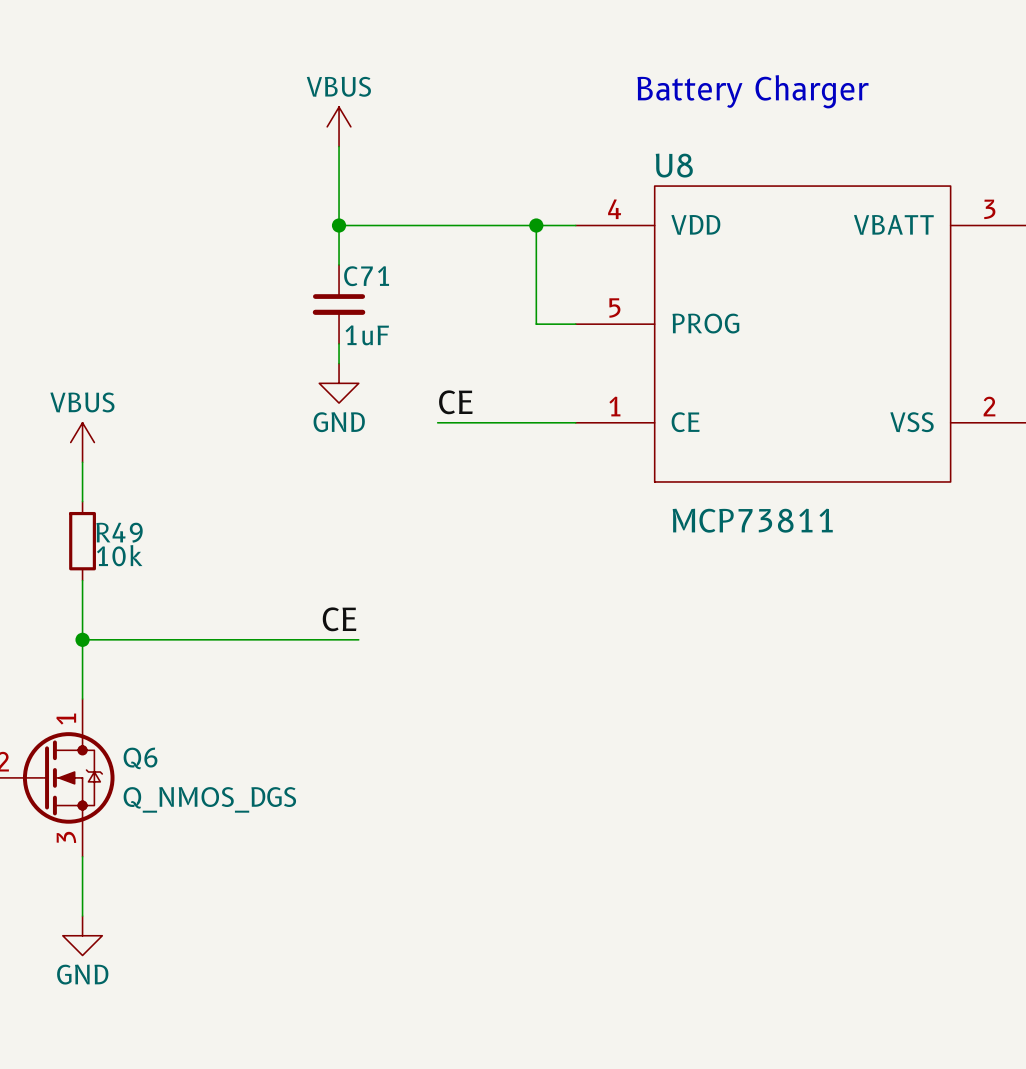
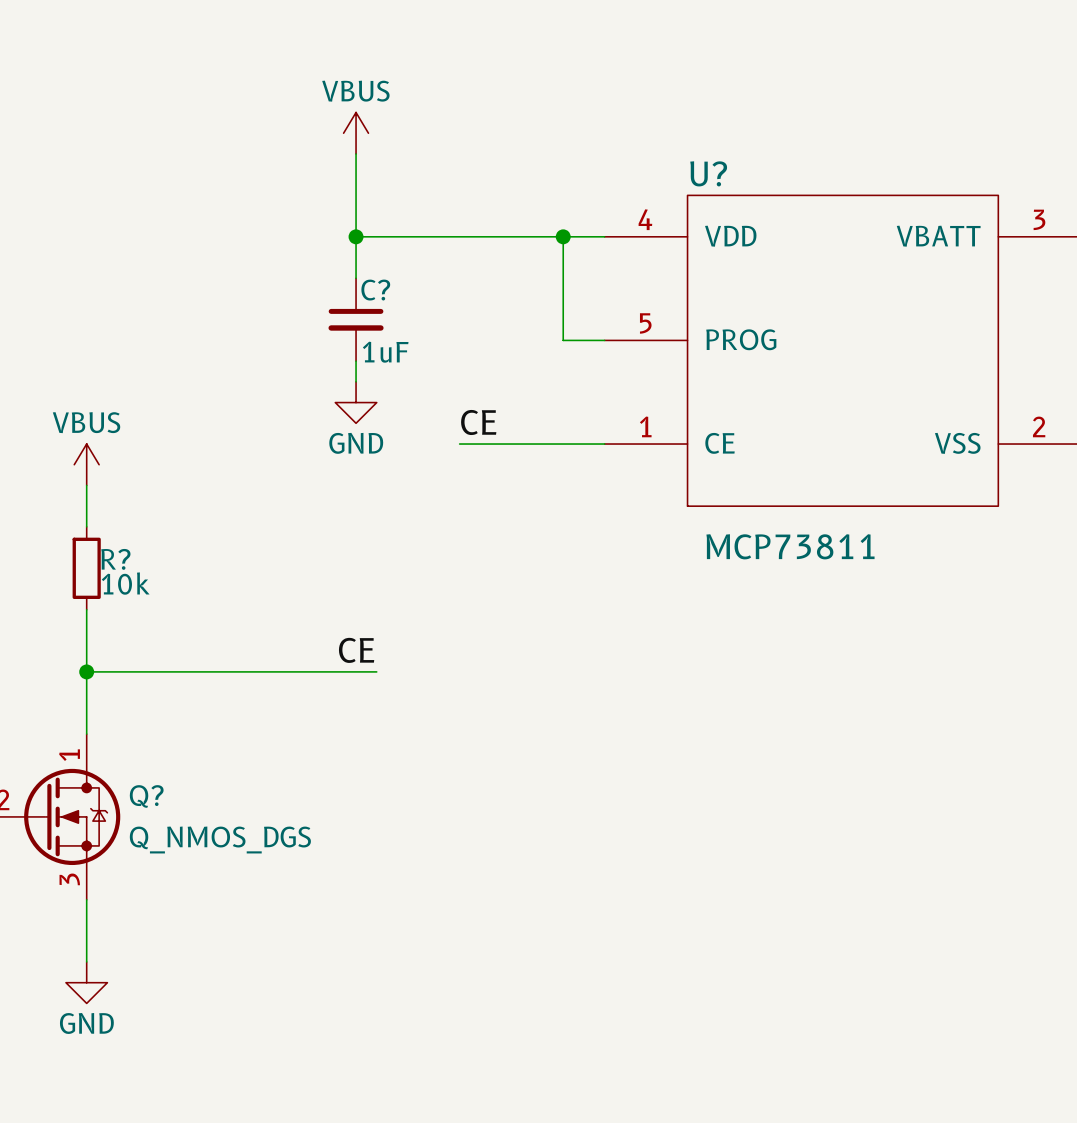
text: Battery Charger (753, 91) -> none
U8 name: U8 (674, 165) -> U? (708, 173)
C71 name: C71 (366, 276) -> C? (375, 290)
R49 name: R49 (119, 532) -> R? (115, 559)
Q6 name: Q6 (140, 758) -> Q? (146, 796)

